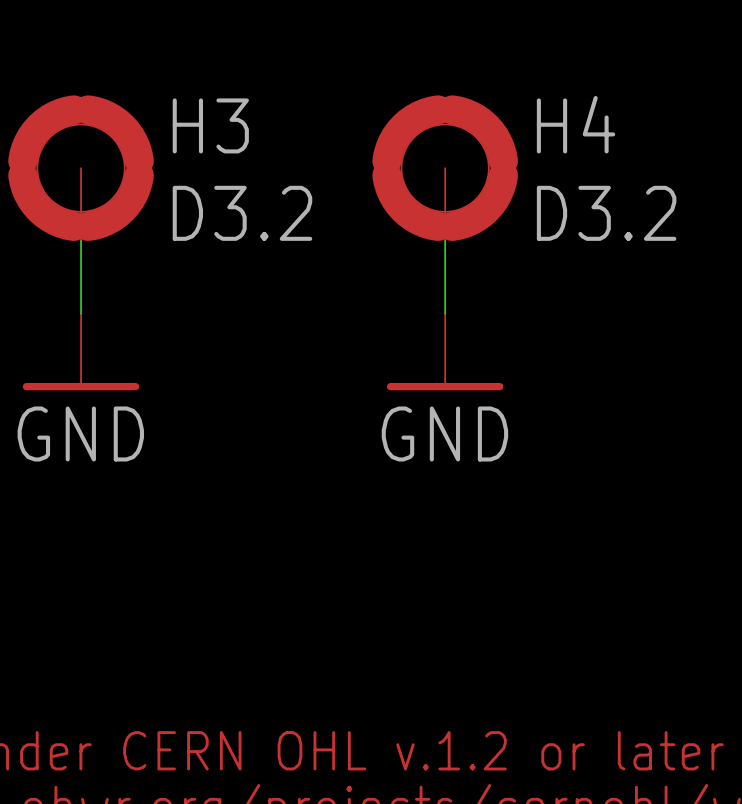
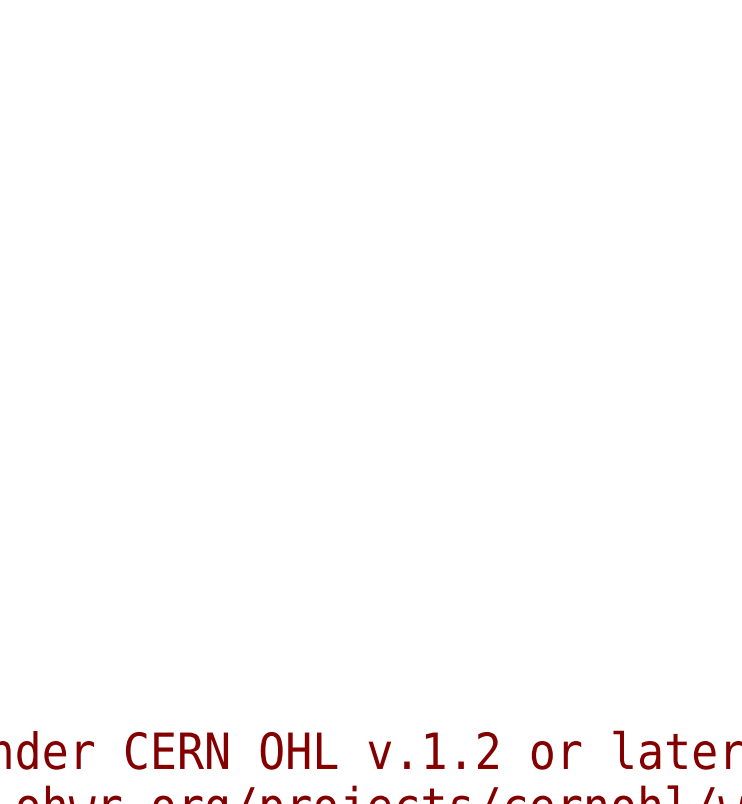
H3: D3.2 (81, 168) -> none
H4: D3.2 (445, 168) -> none
wire: (81, 240) (81, 313) -> none
wire: (445, 240) (445, 313) -> none
power symbol: GND (81, 352) -> none
power symbol: GND (445, 352) -> none

